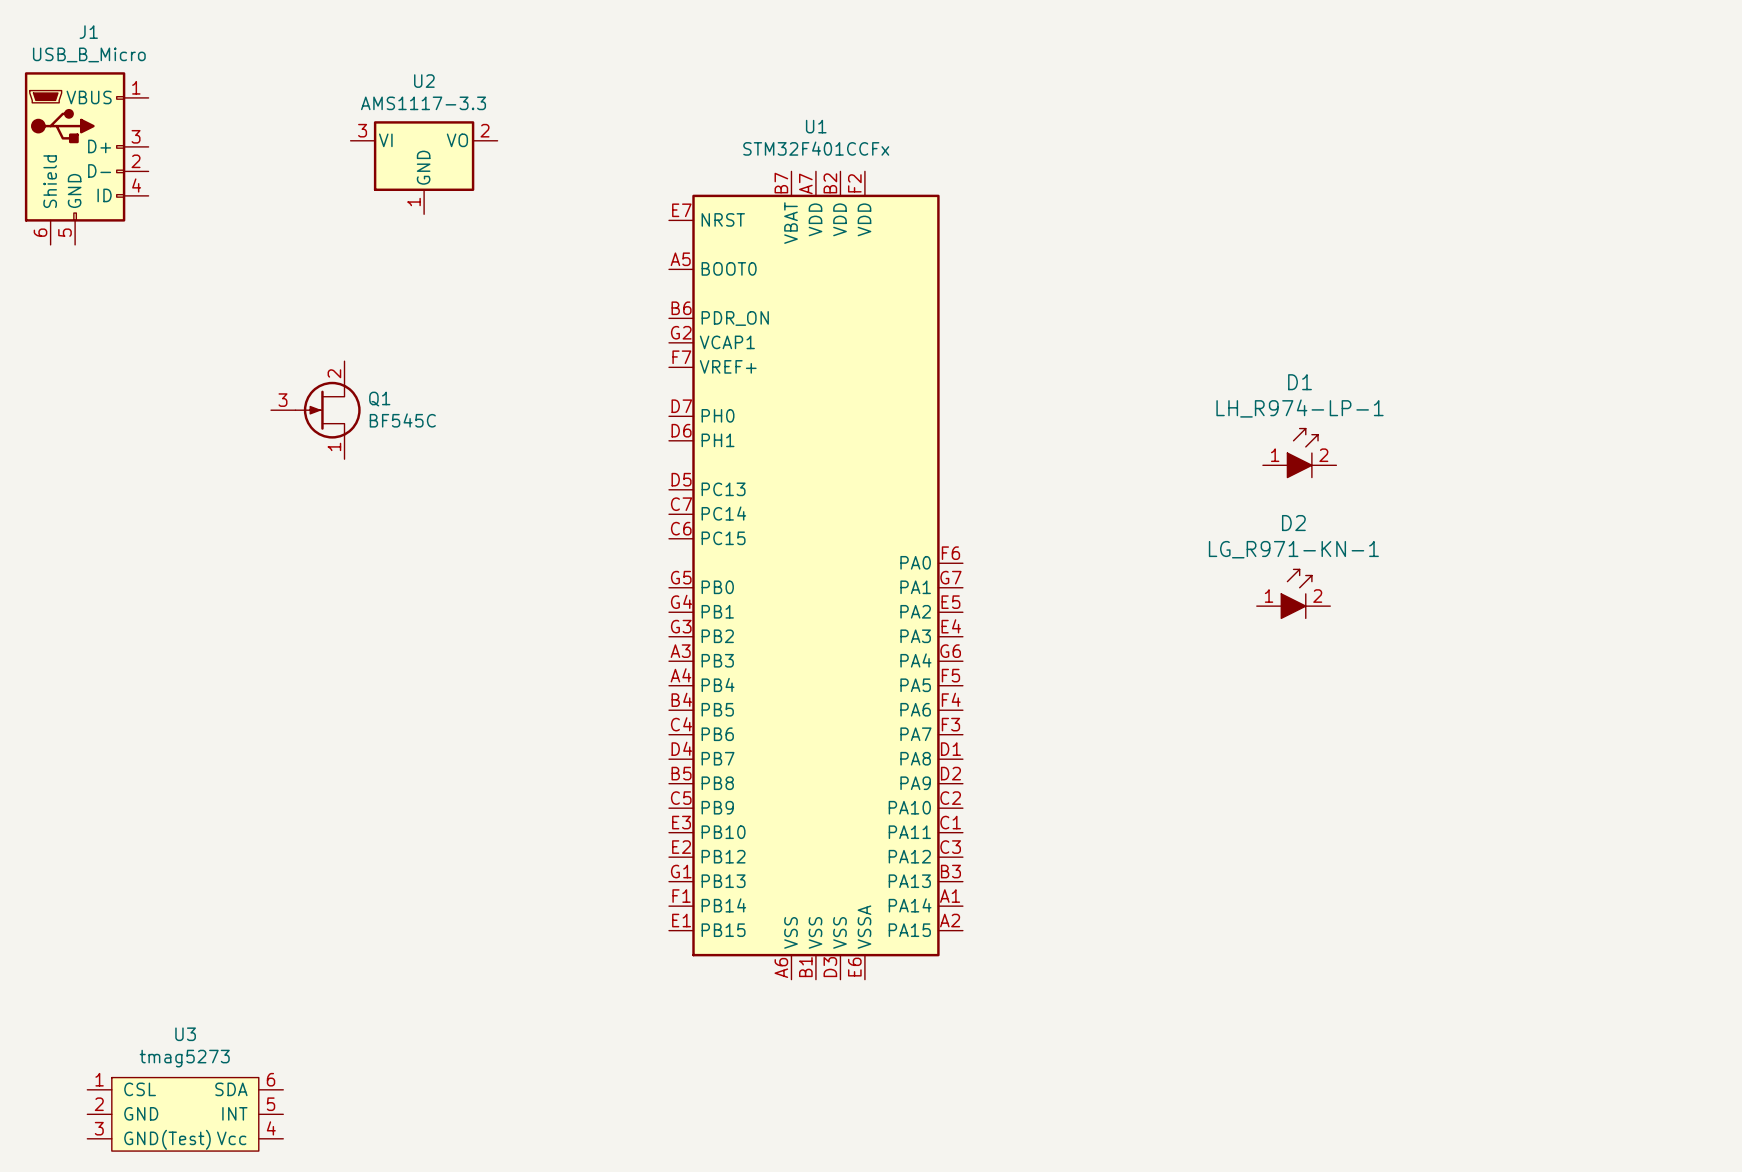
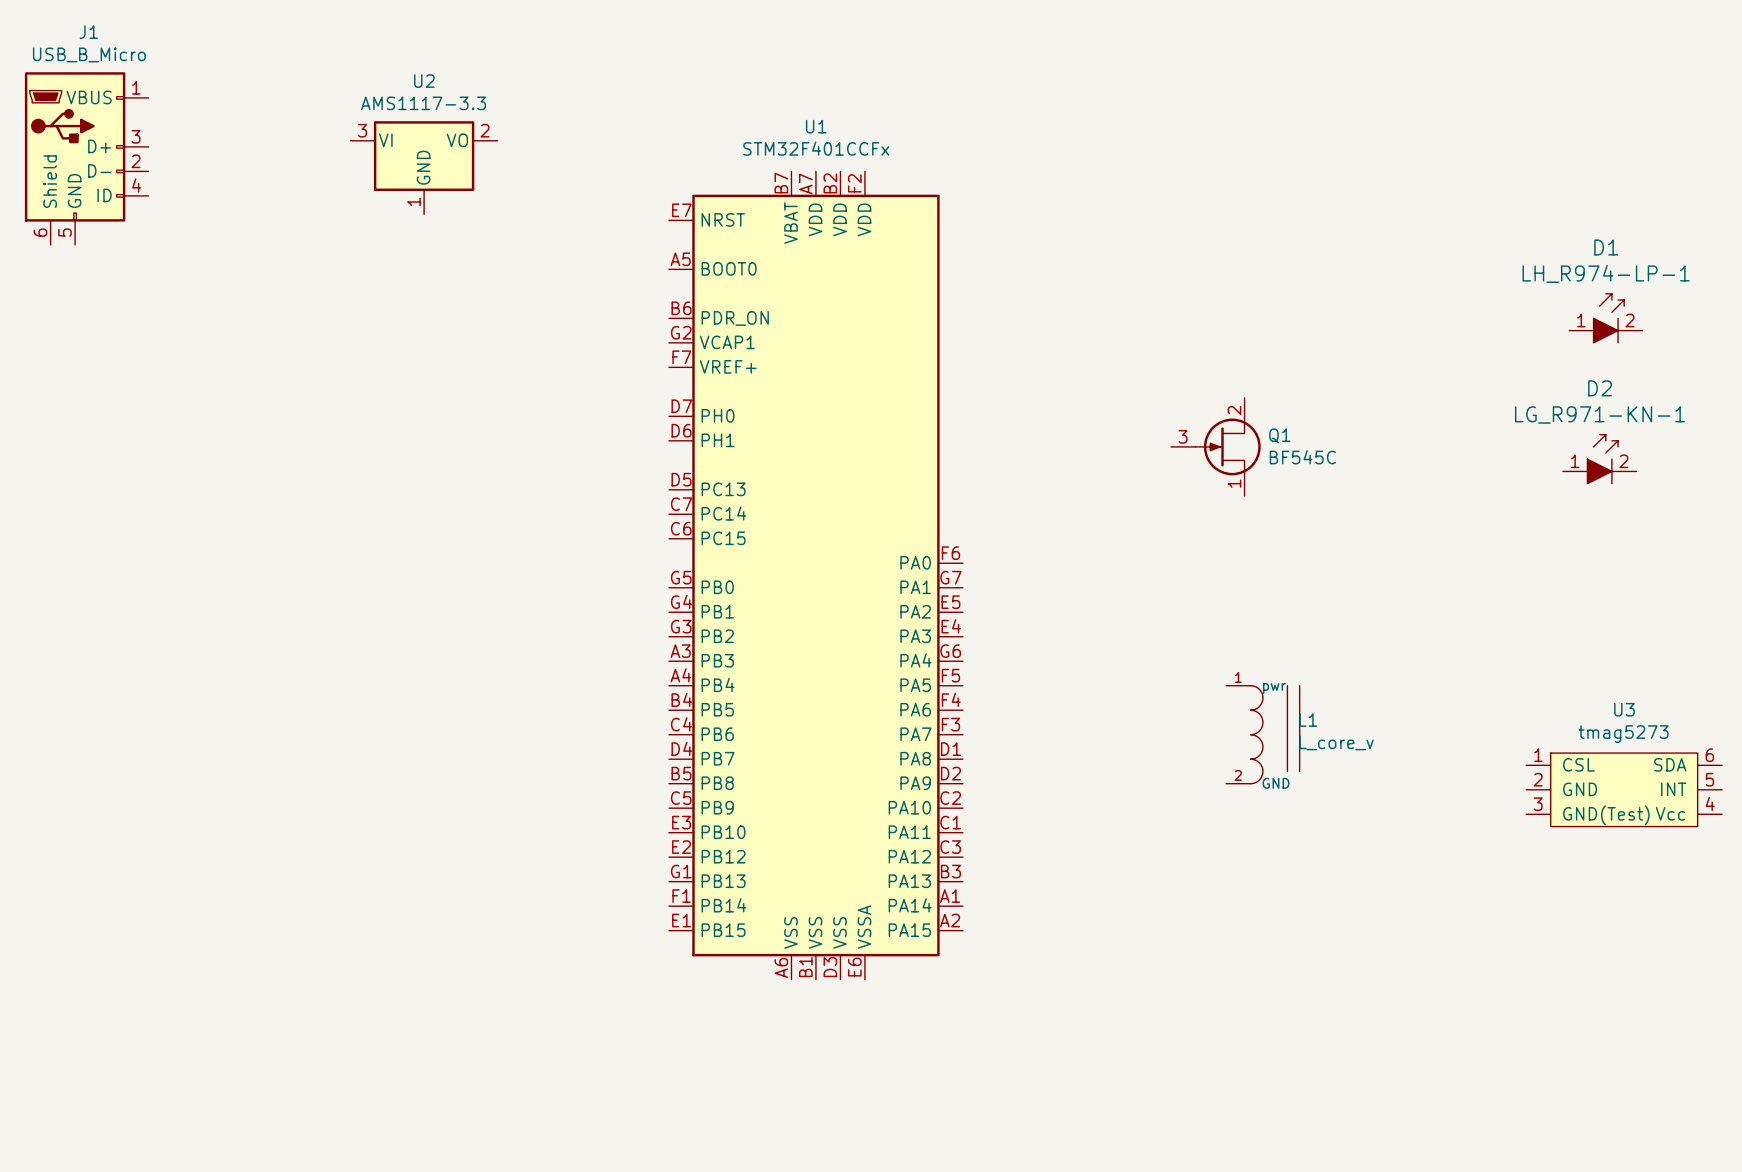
Q1 position: (315, 410) -> (1215, 446)
D1 position: (1299, 453) -> (1605, 318)
D2 position: (1293, 593) -> (1599, 459)
L1: none -> L_core_v (1262, 734)
U3 position: (185, 1114) -> (1624, 789)

